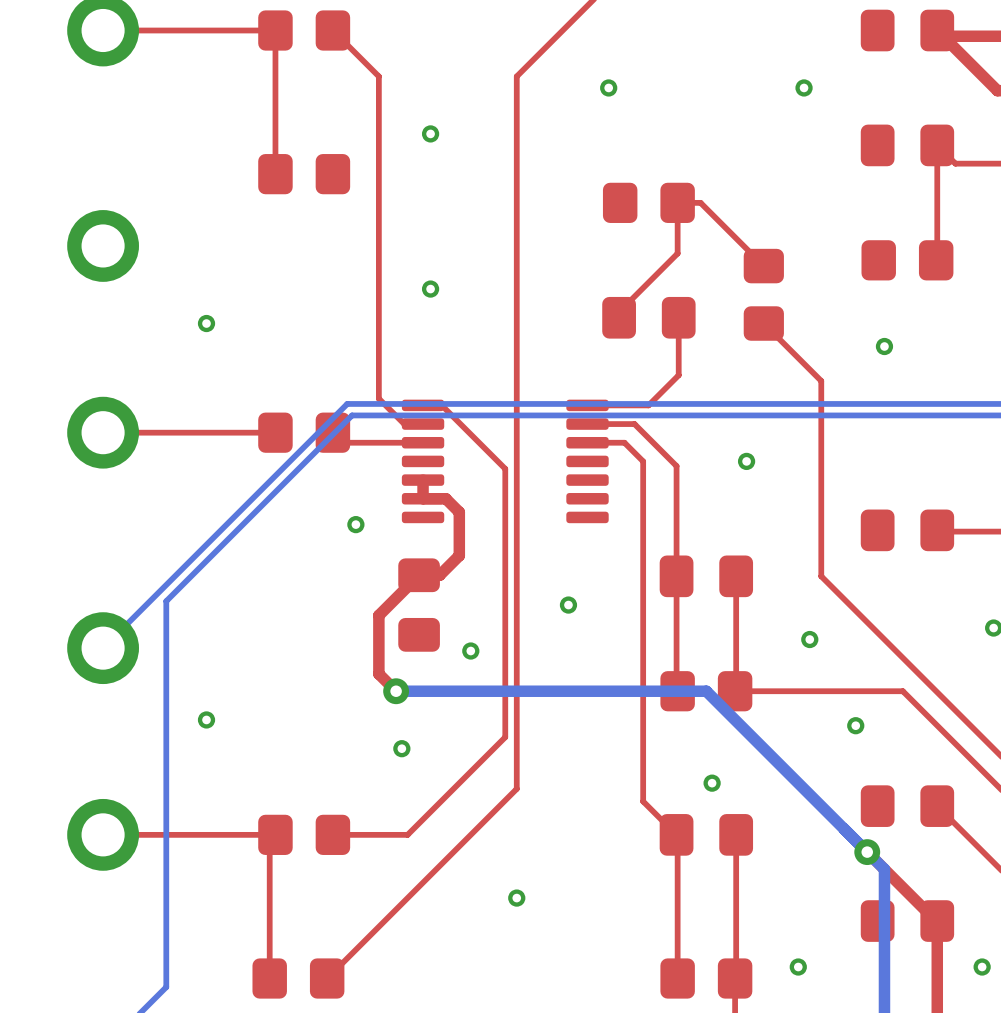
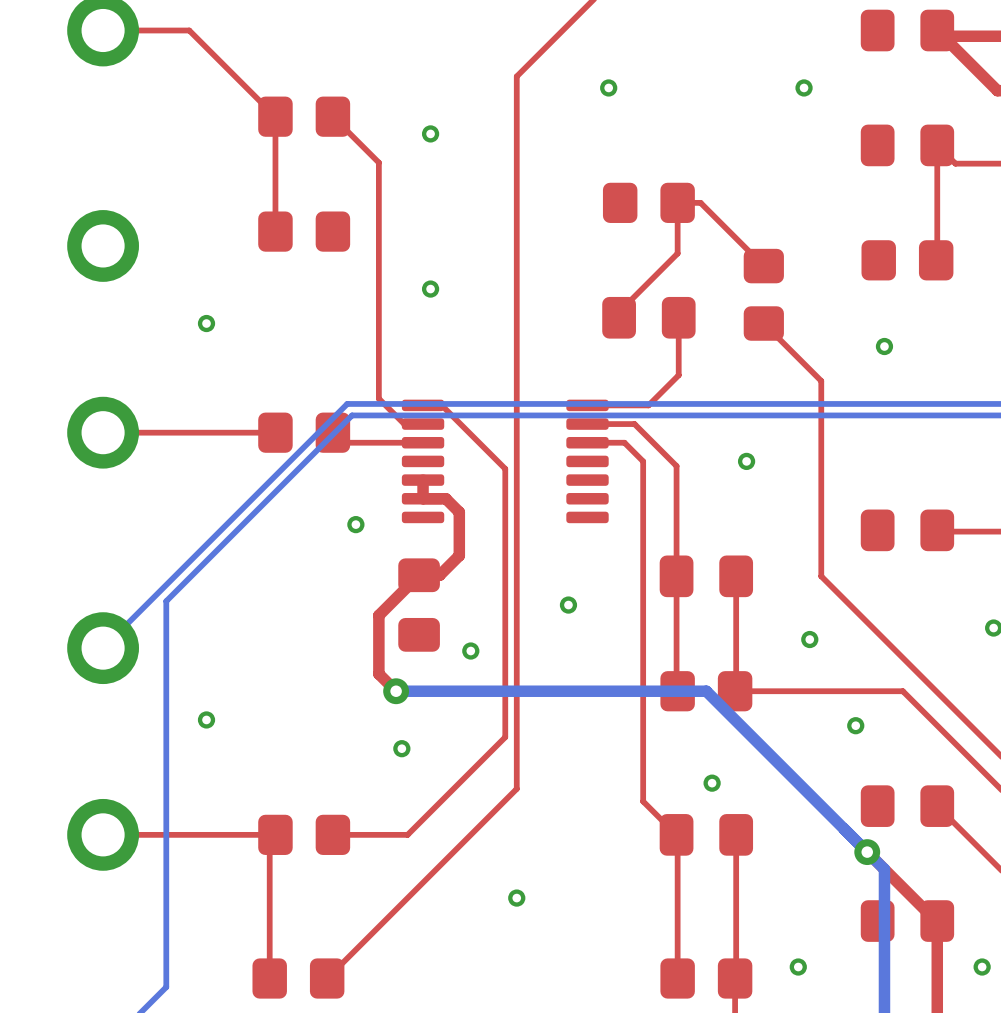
top track: (189, 30) (275, 30) (275, 116) -> (189, 30) (275, 116)
part: (304, 30) -> none
top track: (332, 30) (378, 76) (378, 162) -> (332, 116) (378, 162)
part: none -> (304, 116)
top track: none -> (275, 174) (275, 231)
part: (304, 174) -> none
part: none -> (304, 231)

